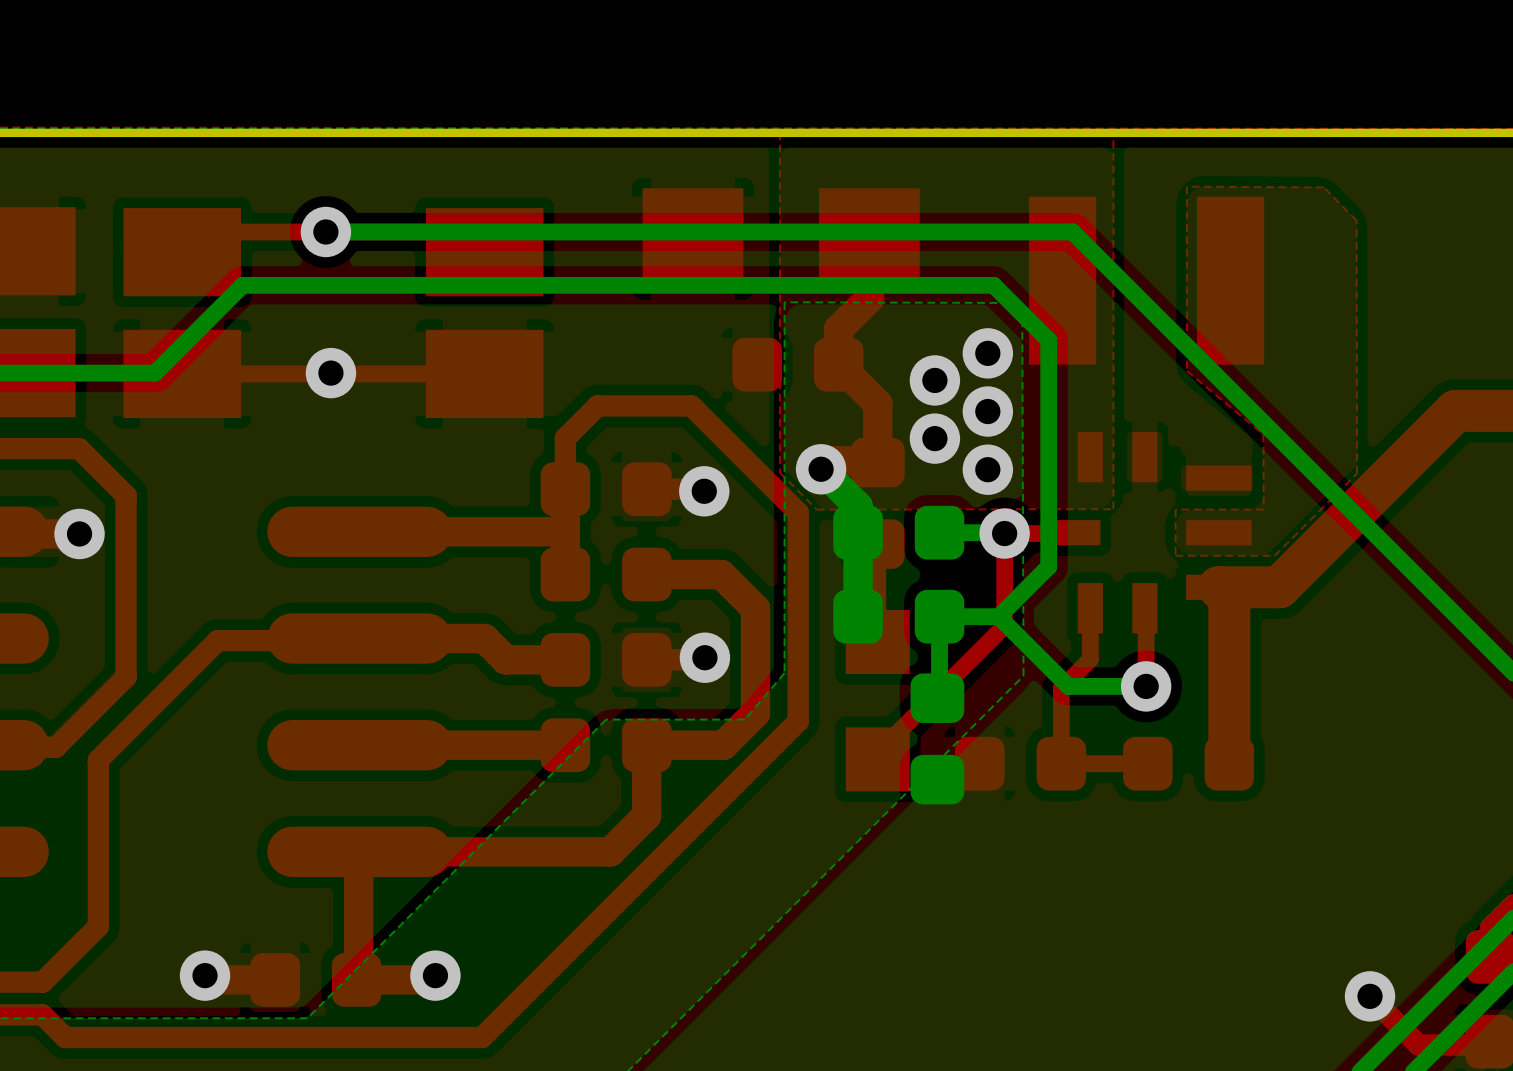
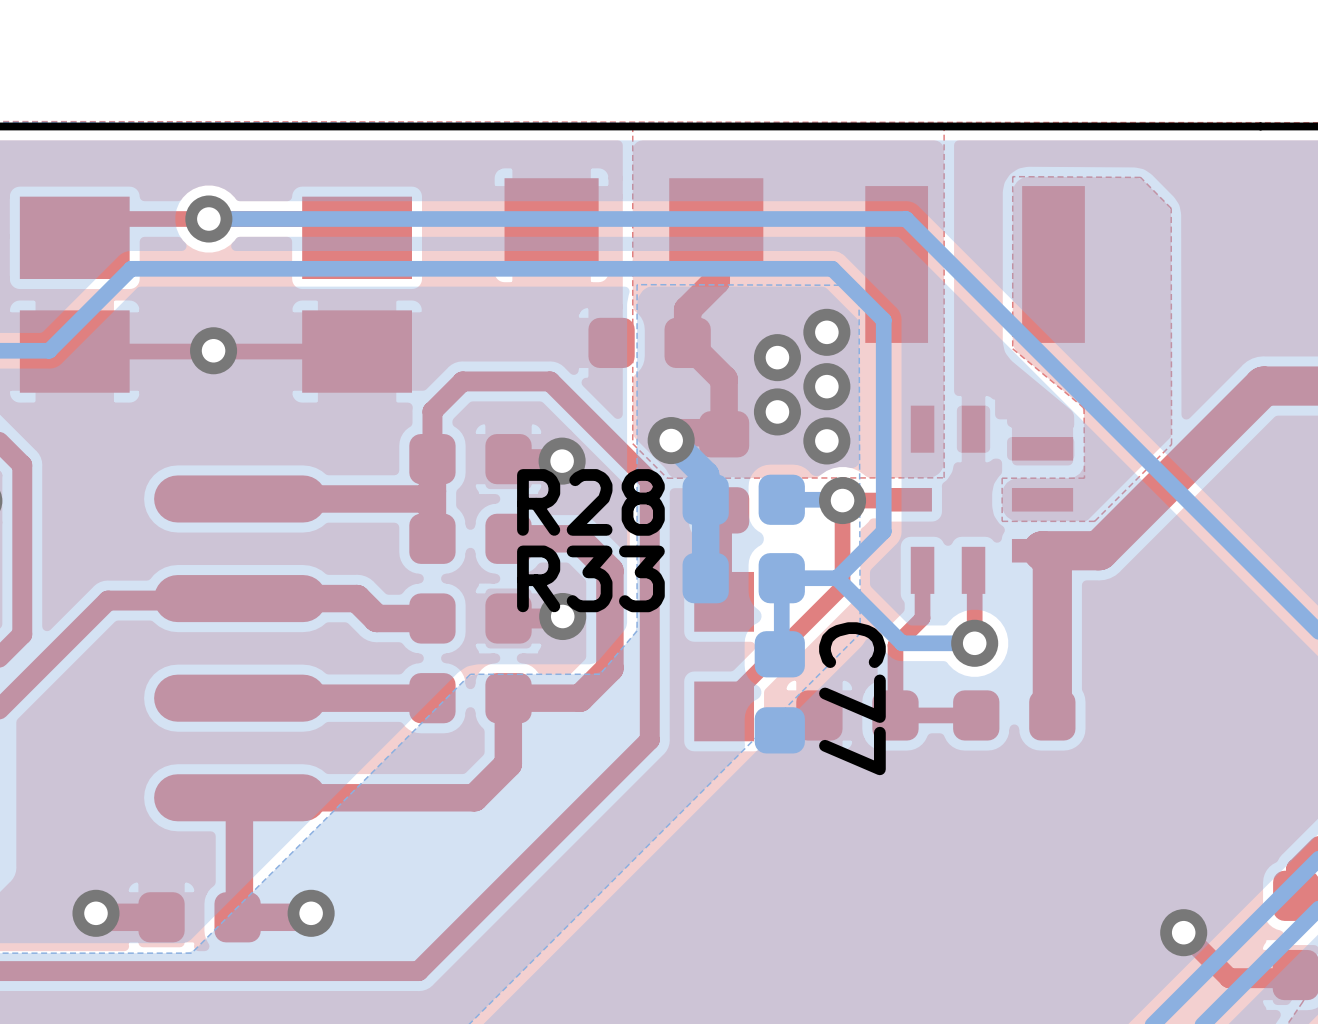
R28 name: none -> R28 (590, 502)
R33 name: none -> R33 (590, 578)
top track: (798, 721) (482, 1037) -> (649, 676) (649, 740) (418, 971) (354, 971)
C77 name: none -> C77 (852, 698)

